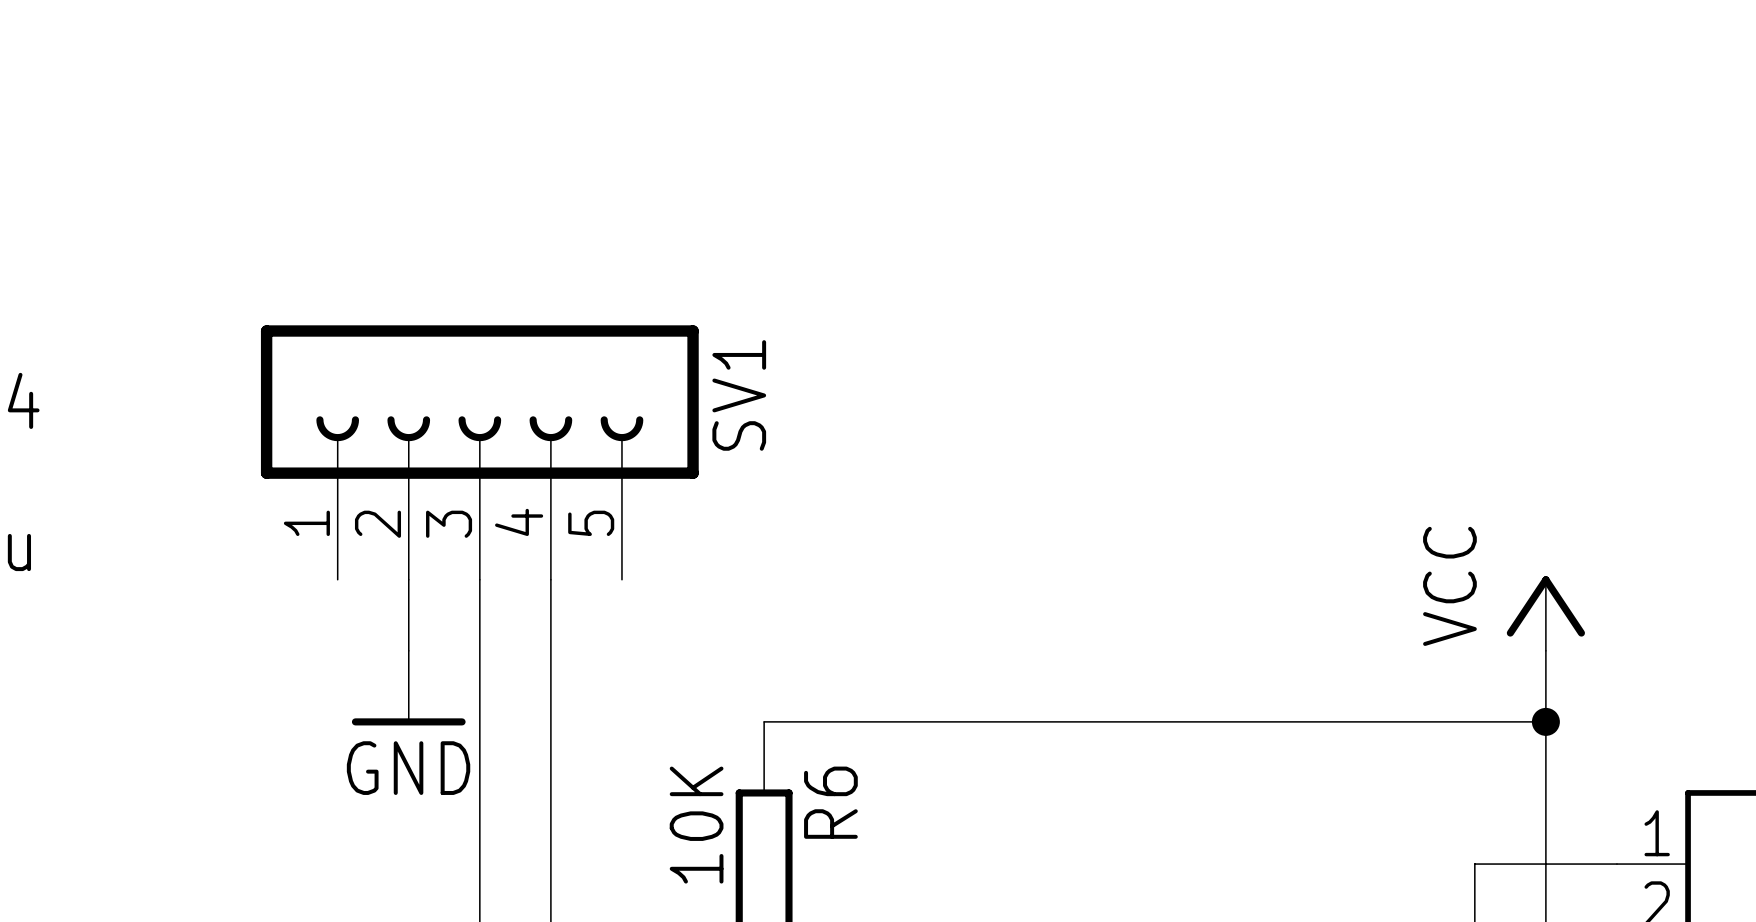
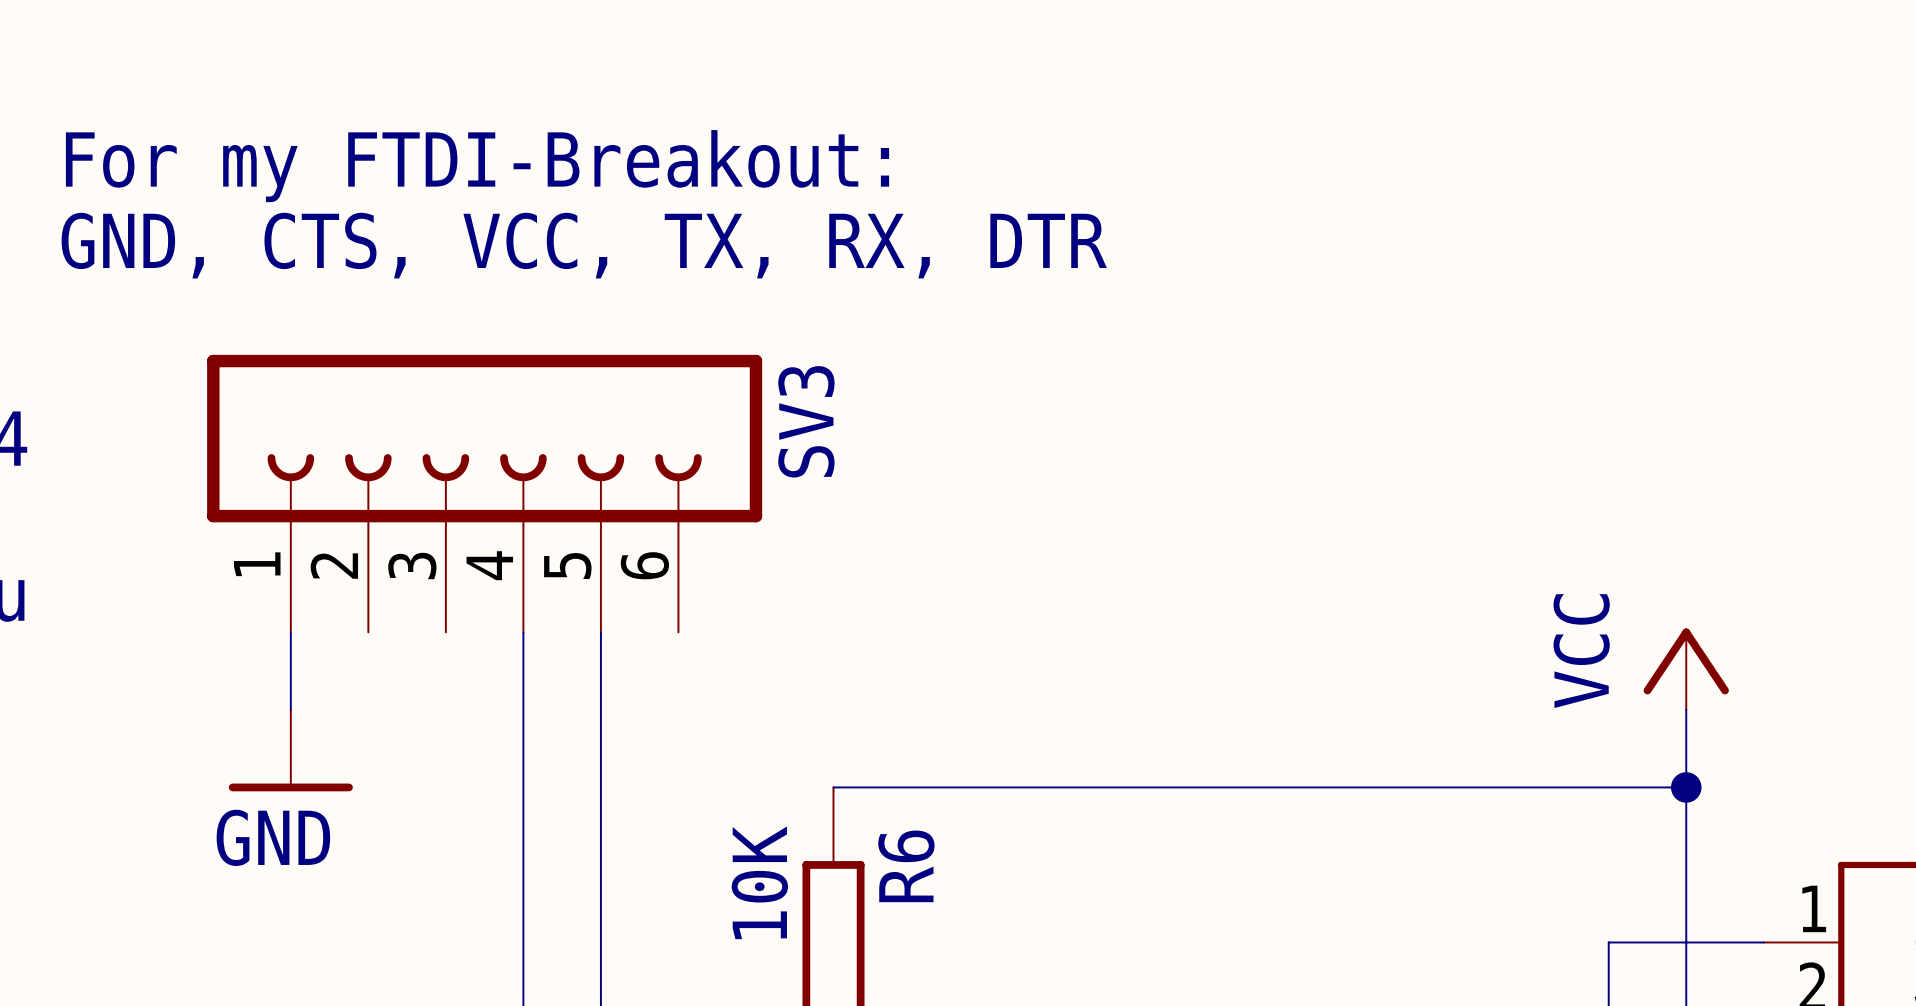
text: none -> For my FTDI-Breakout: (477, 166)
text: none -> GND, CTS, VCC, TX, RX, DTR (584, 245)
SV3: none -> (484, 493)
SV1: (479, 452) -> none
wire: (408, 579) (408, 650) -> (290, 632) (290, 709)
power symbol position: GND (408, 688) -> GND (290, 750)

